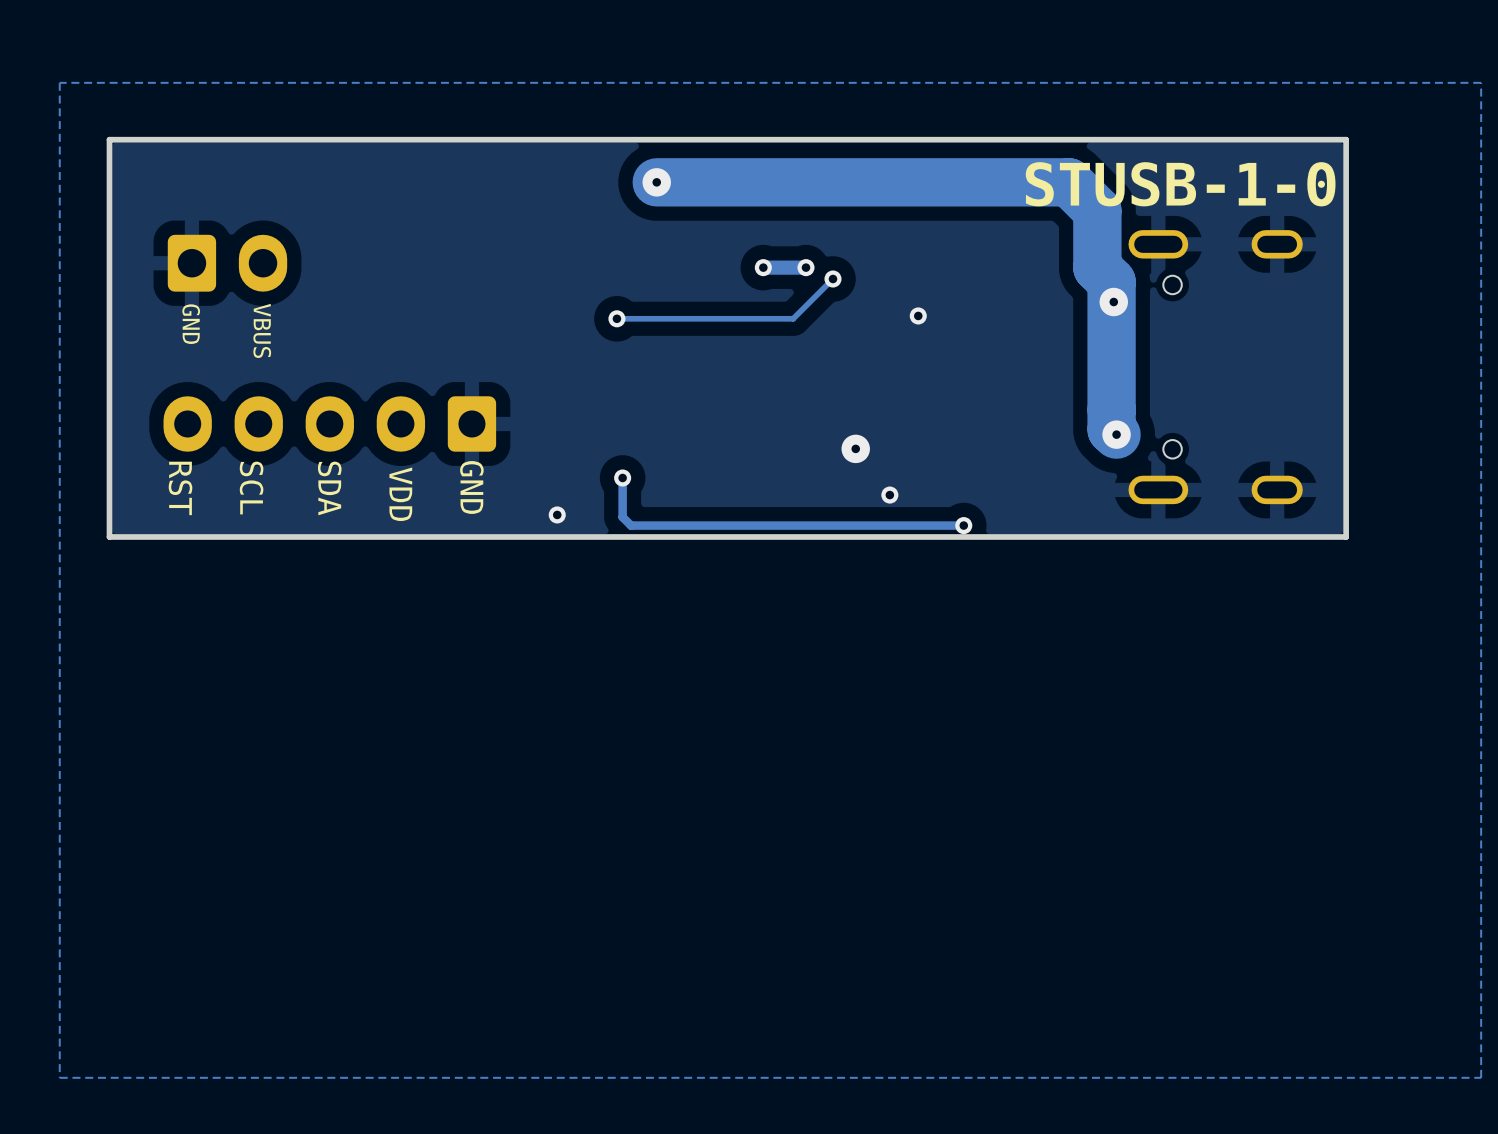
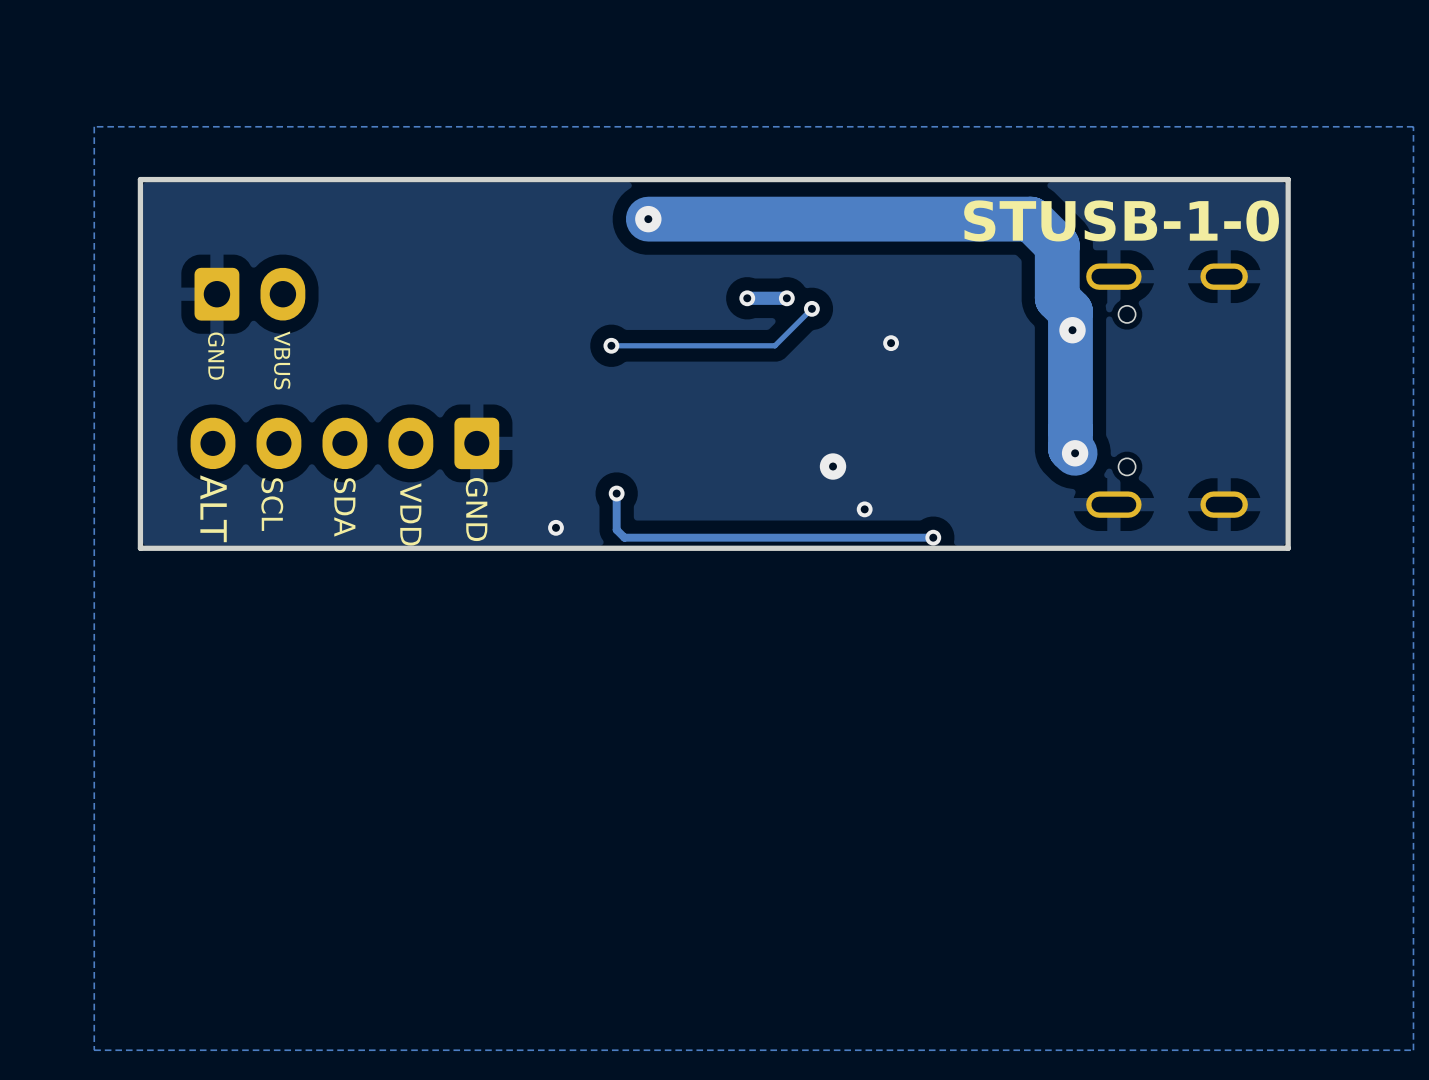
text: RST (180, 488) -> ALT (213, 508)

